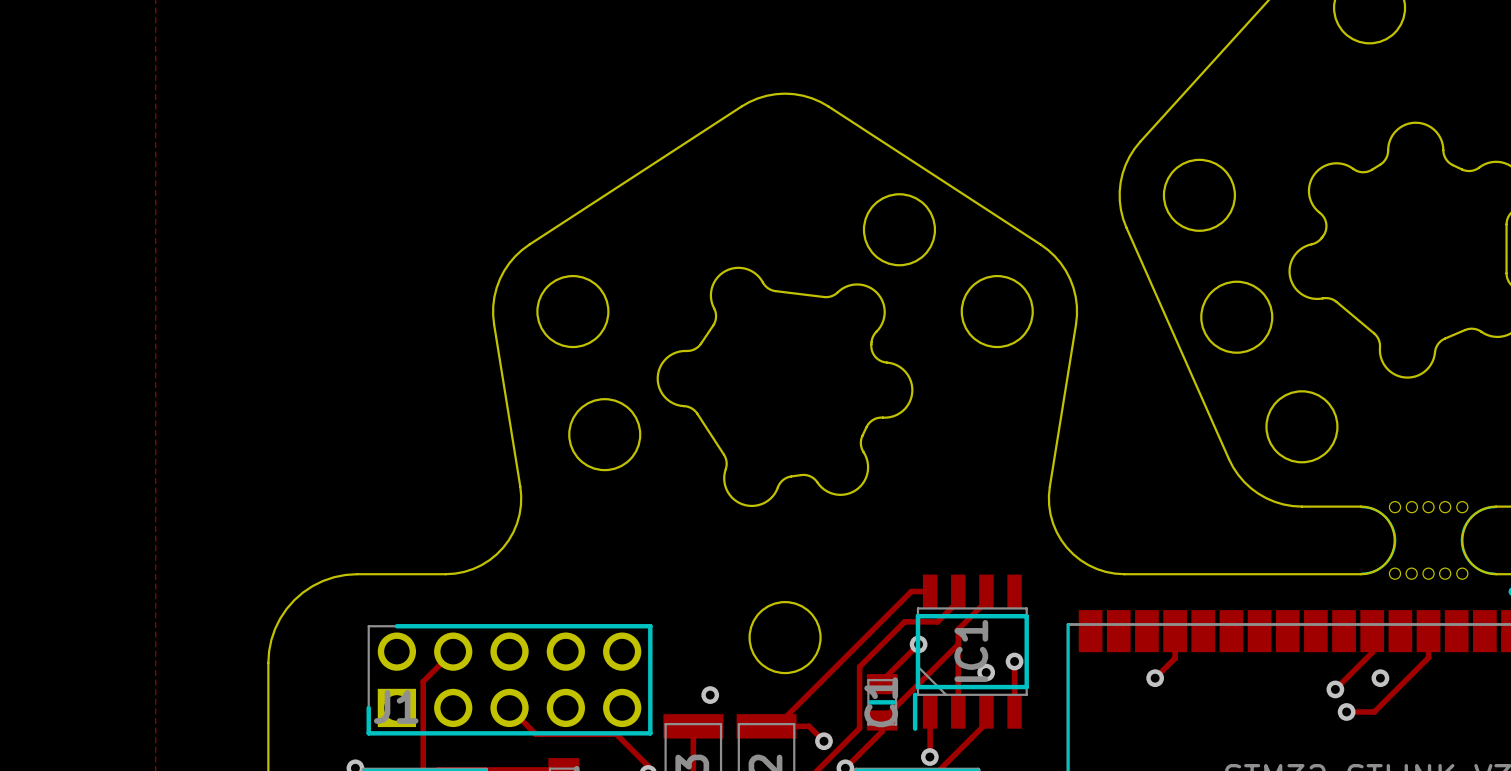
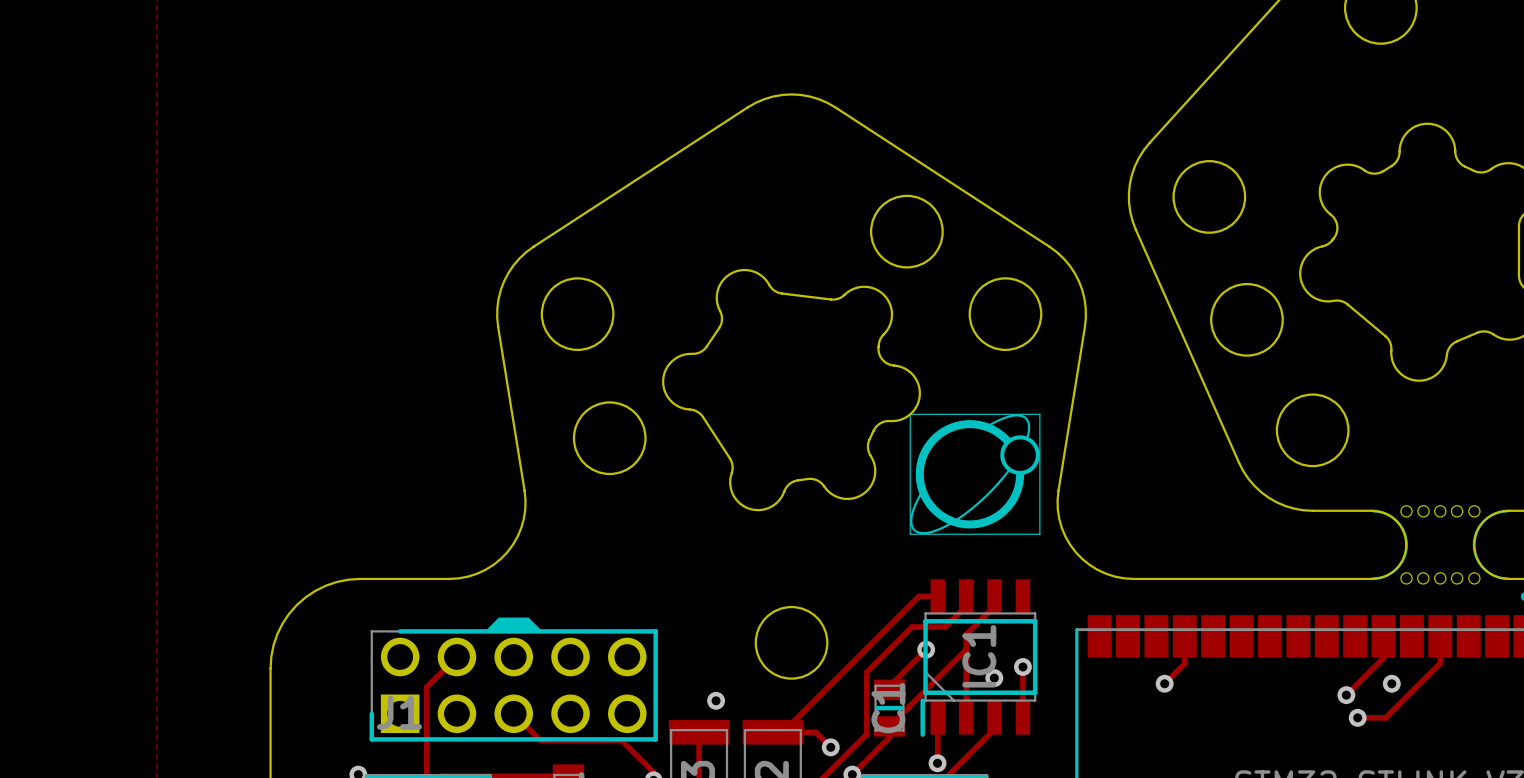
line: none -> (910, 414) (910, 534) (1039, 534) (1039, 414) (910, 414)
drawing: none -> [910, 414, 1040, 535]
drawing: none -> [486, 617, 541, 633]

